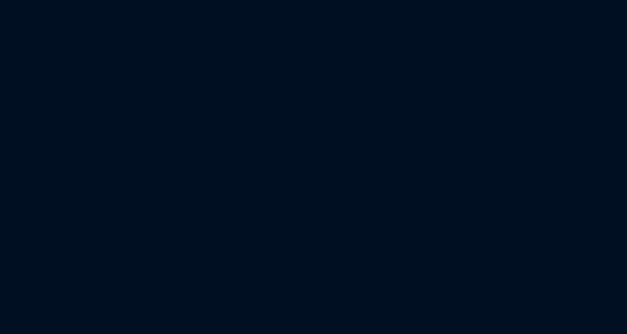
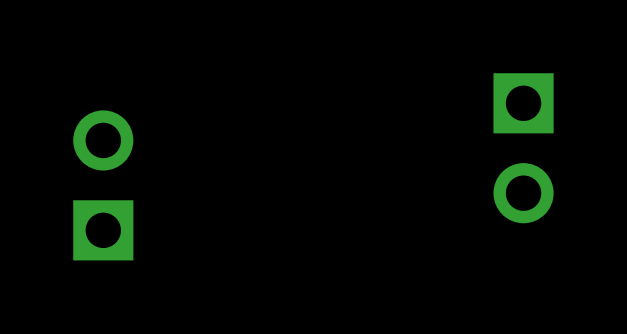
part: none -> (523, 148)
part: none -> (103, 185)

